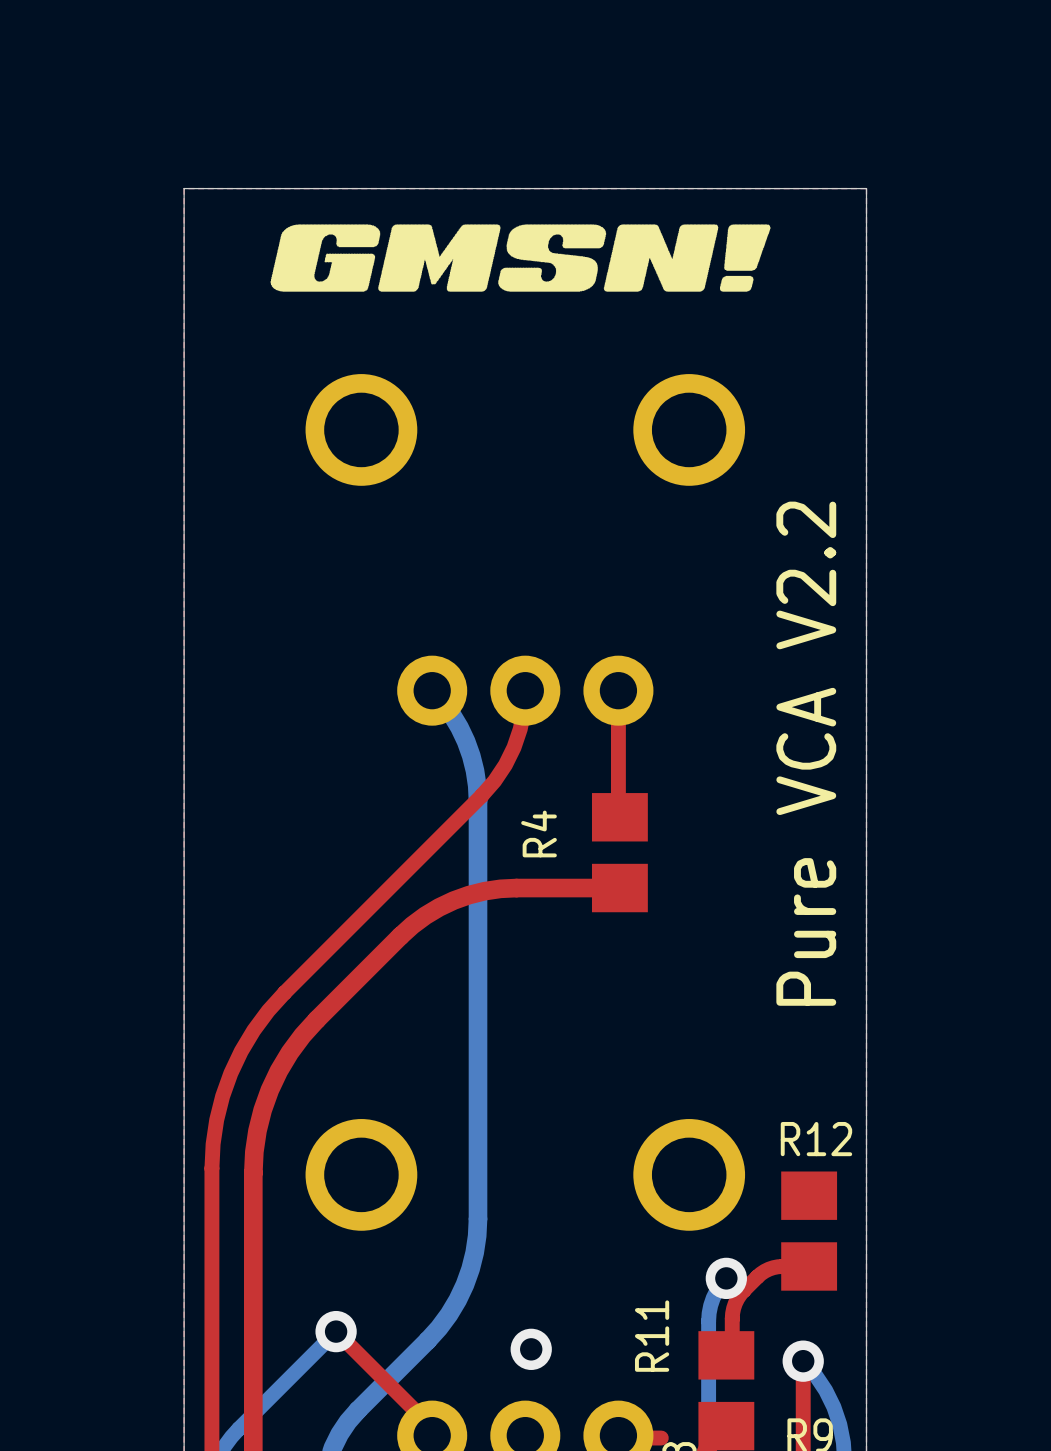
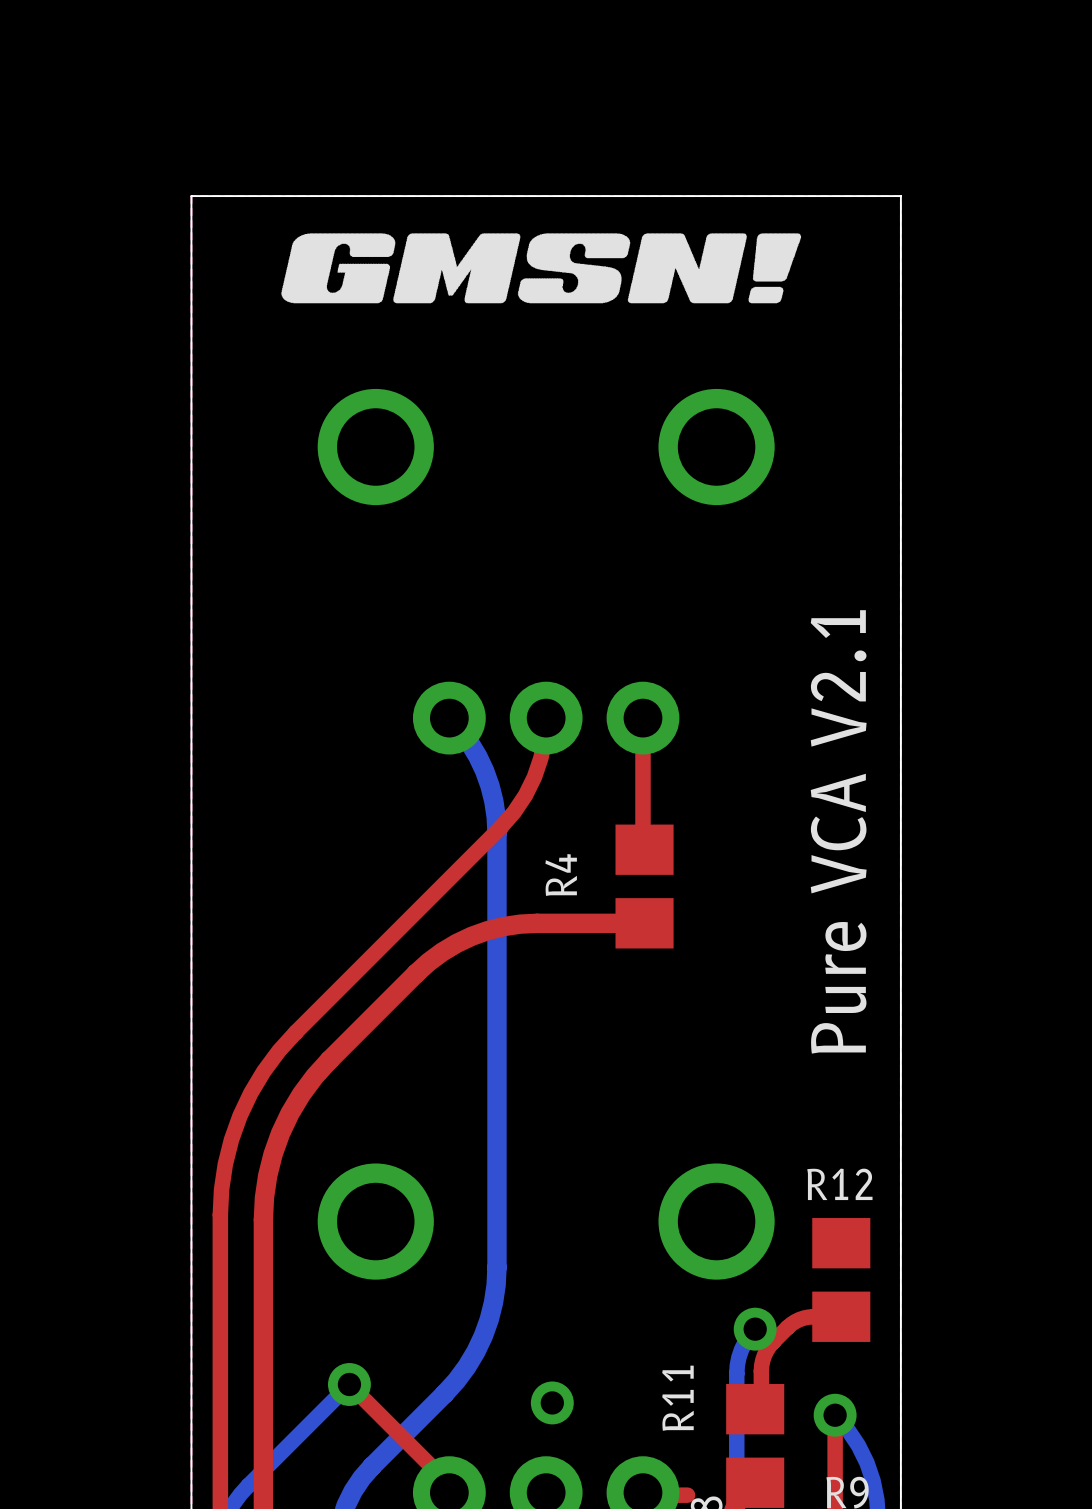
text: Pure VCA V2.2 (806, 753) -> Pure VCA V2.1 (838, 831)

